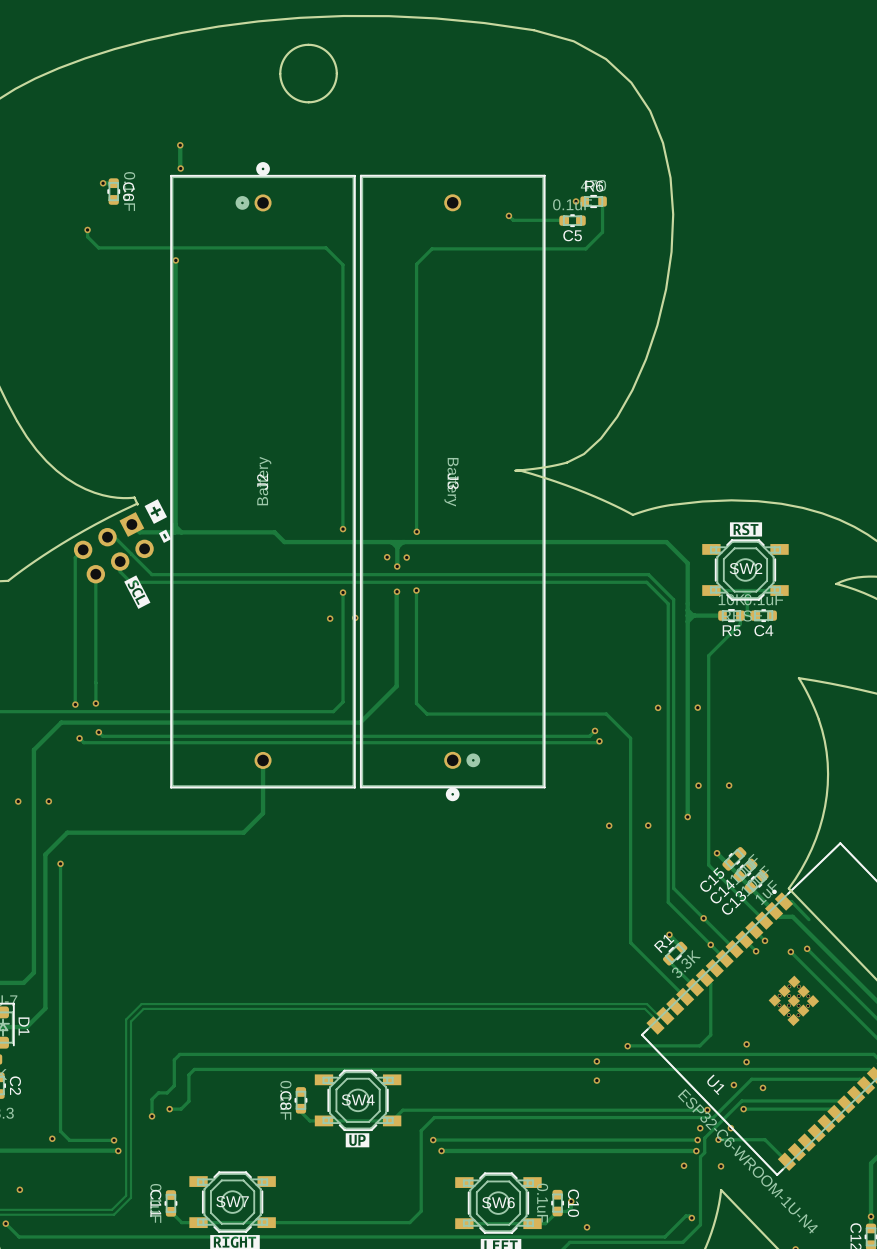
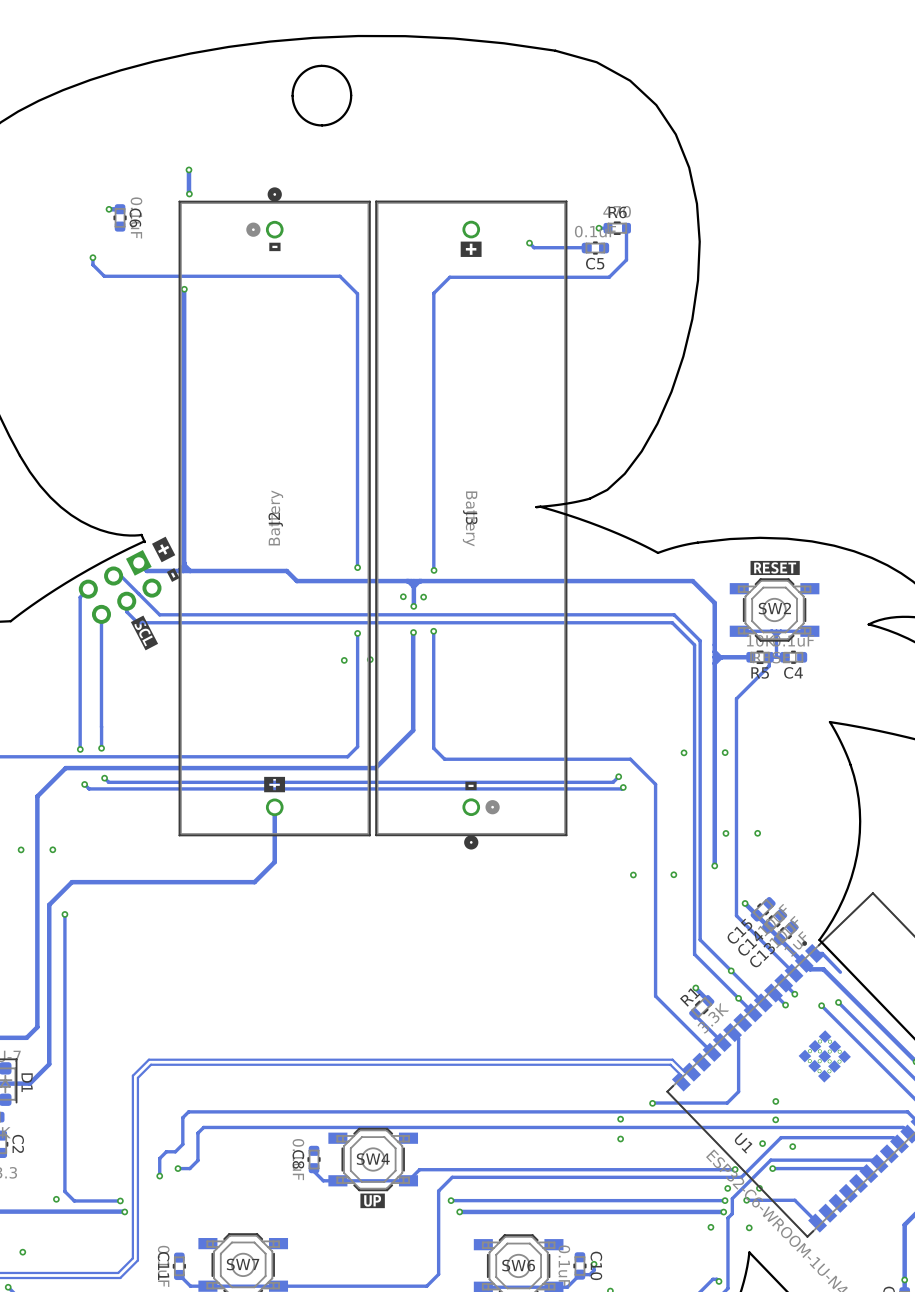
drawing: none -> [460, 241, 482, 257]
drawing: none -> [269, 242, 281, 252]
drawing shape: [729, 522, 763, 537] -> [750, 560, 800, 576]
drawing: none -> [264, 776, 286, 793]
drawing: none -> [465, 781, 477, 791]

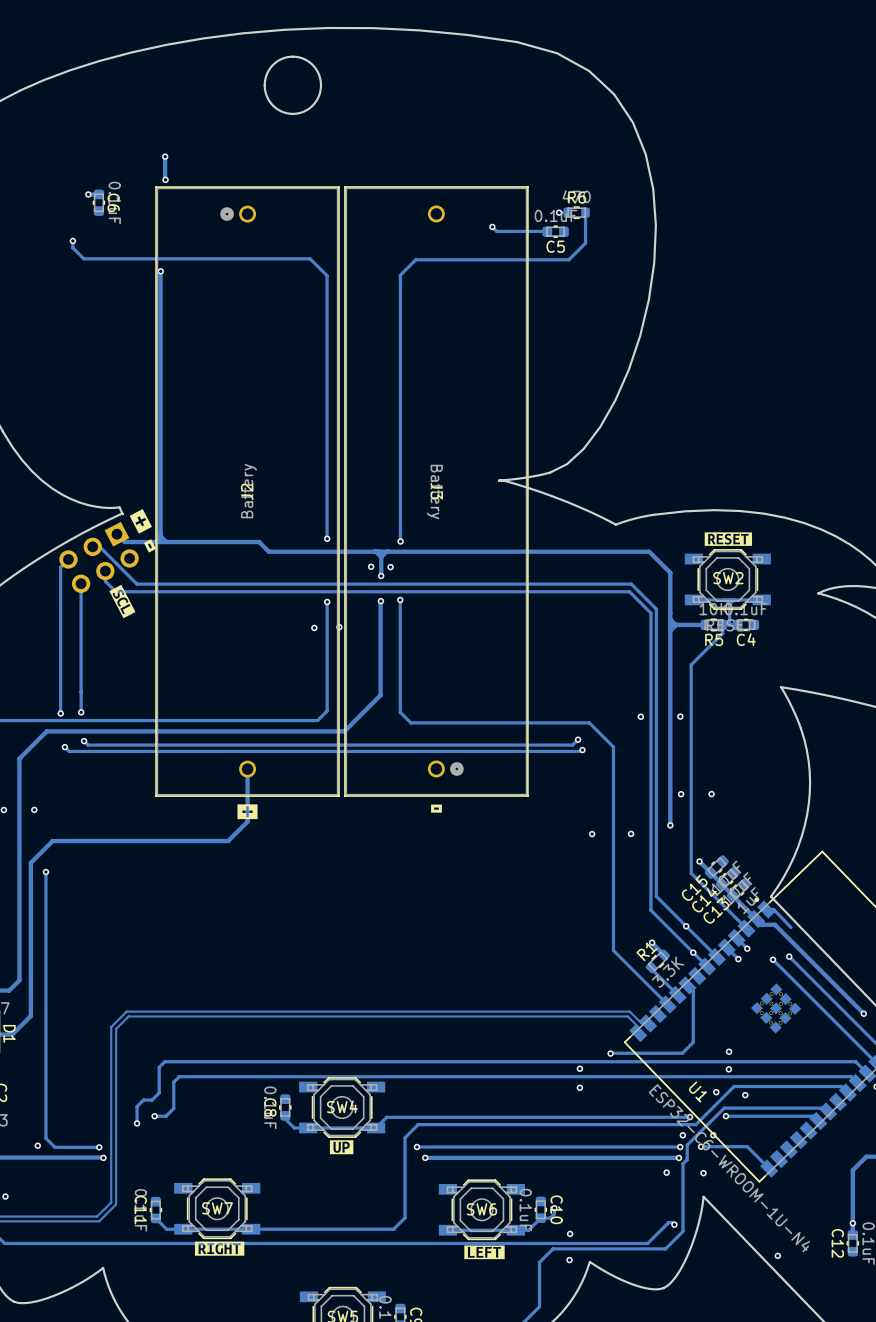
J2 footprint: [178, 187, 371, 837] -> [155, 186, 340, 797]
J3 footprint: [375, 200, 568, 850] -> [344, 186, 529, 797]
drawing: [460, 241, 482, 257] -> none
drawing: [269, 242, 281, 252] -> none
drawing position: (274, 784) -> (247, 811)
drawing position: (471, 785) -> (436, 808)

